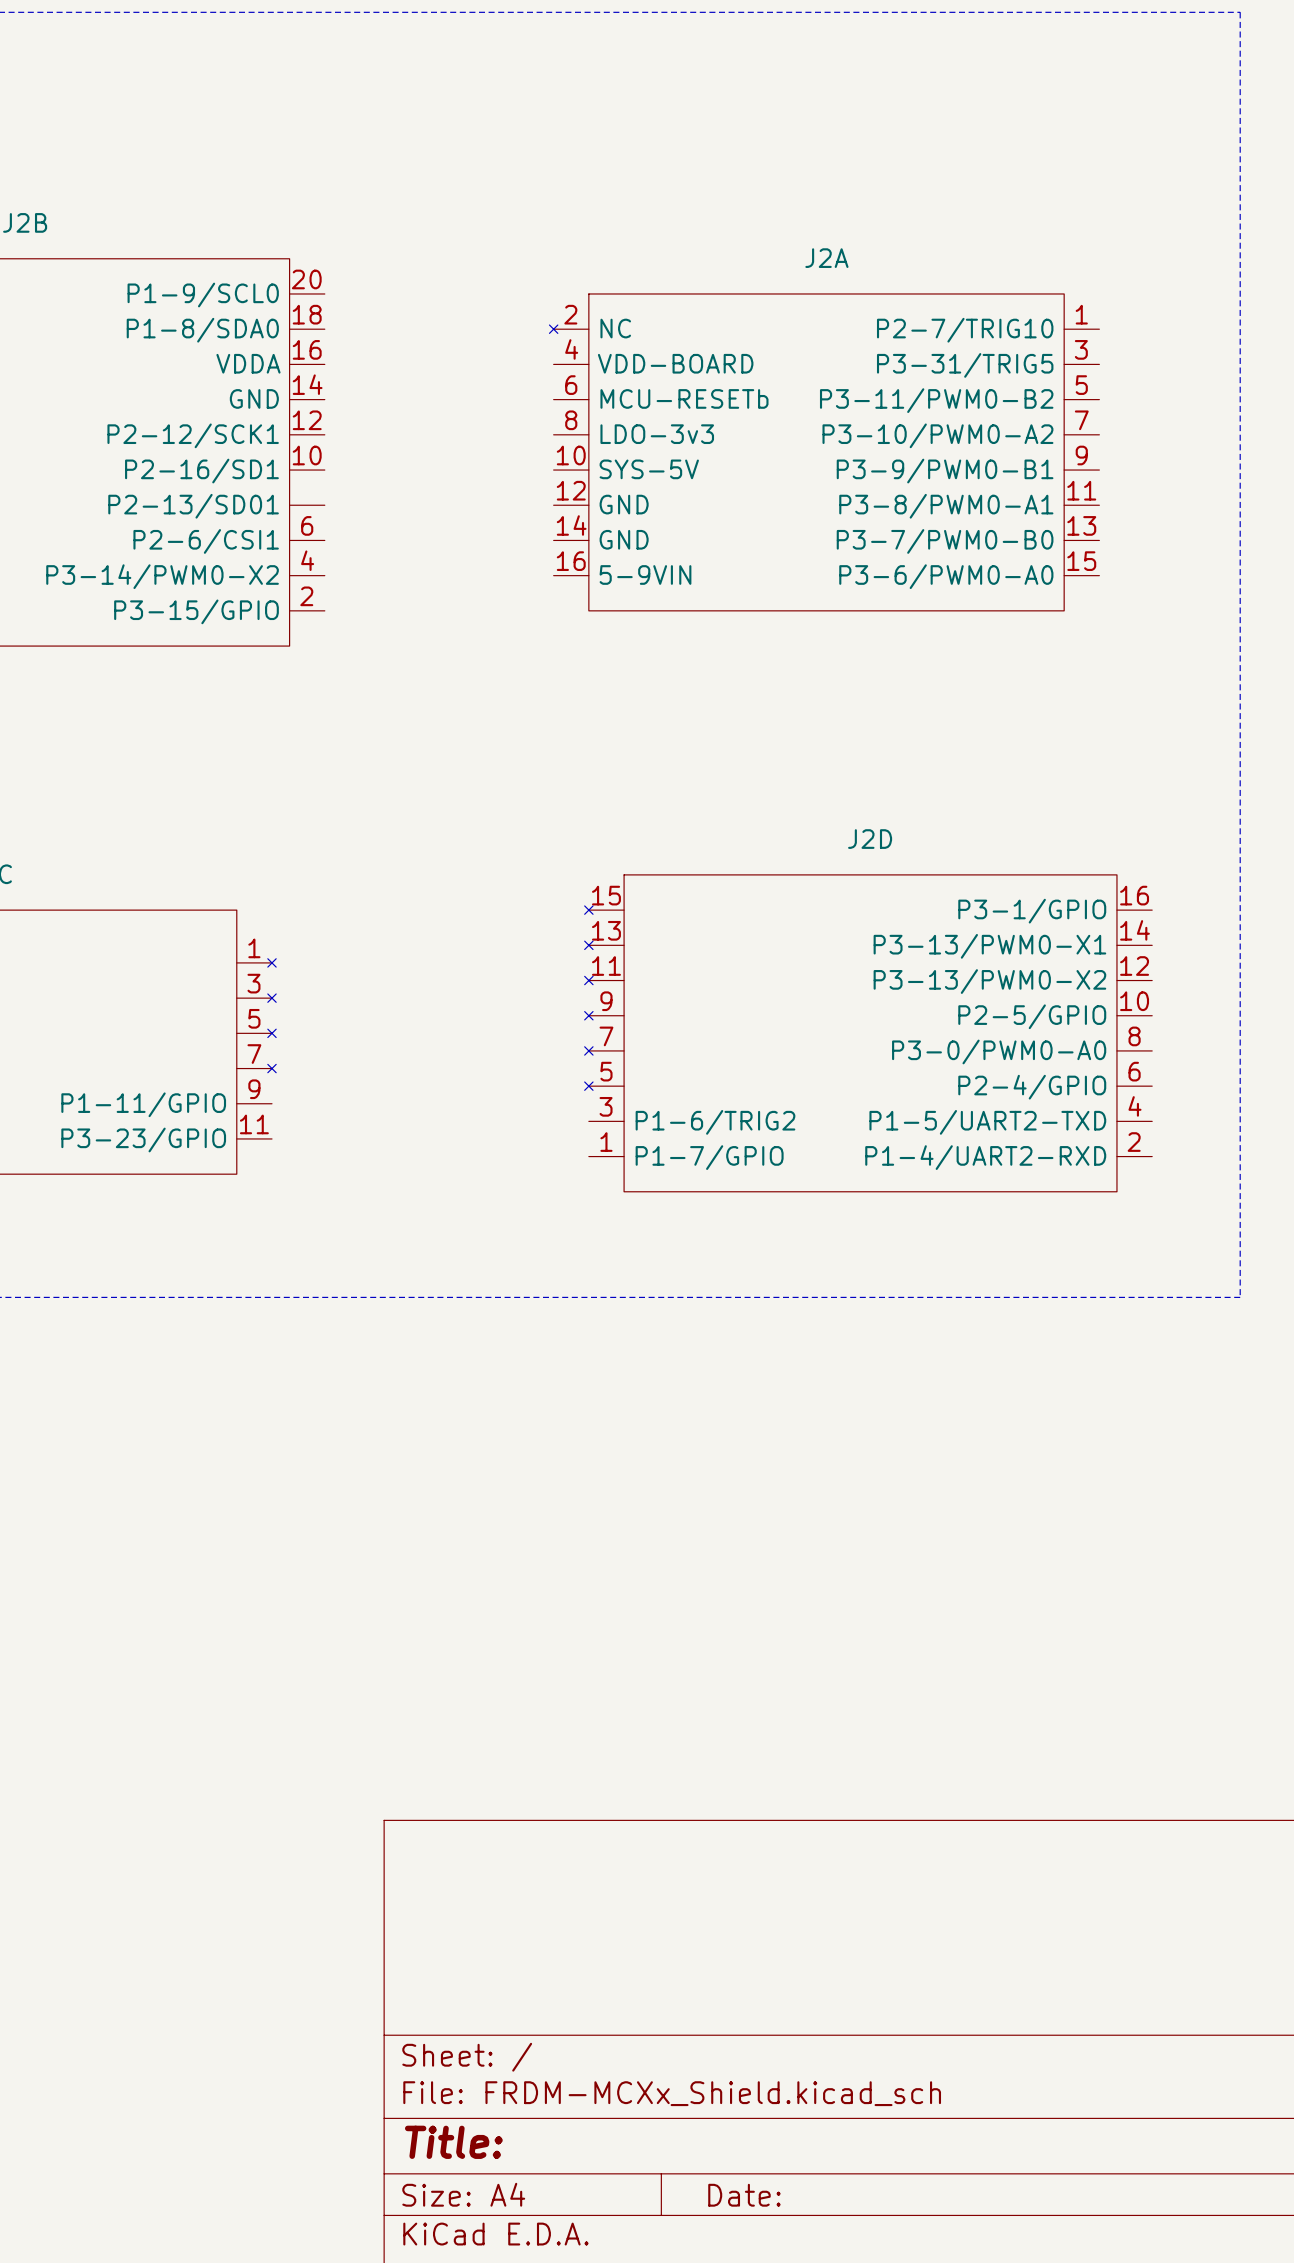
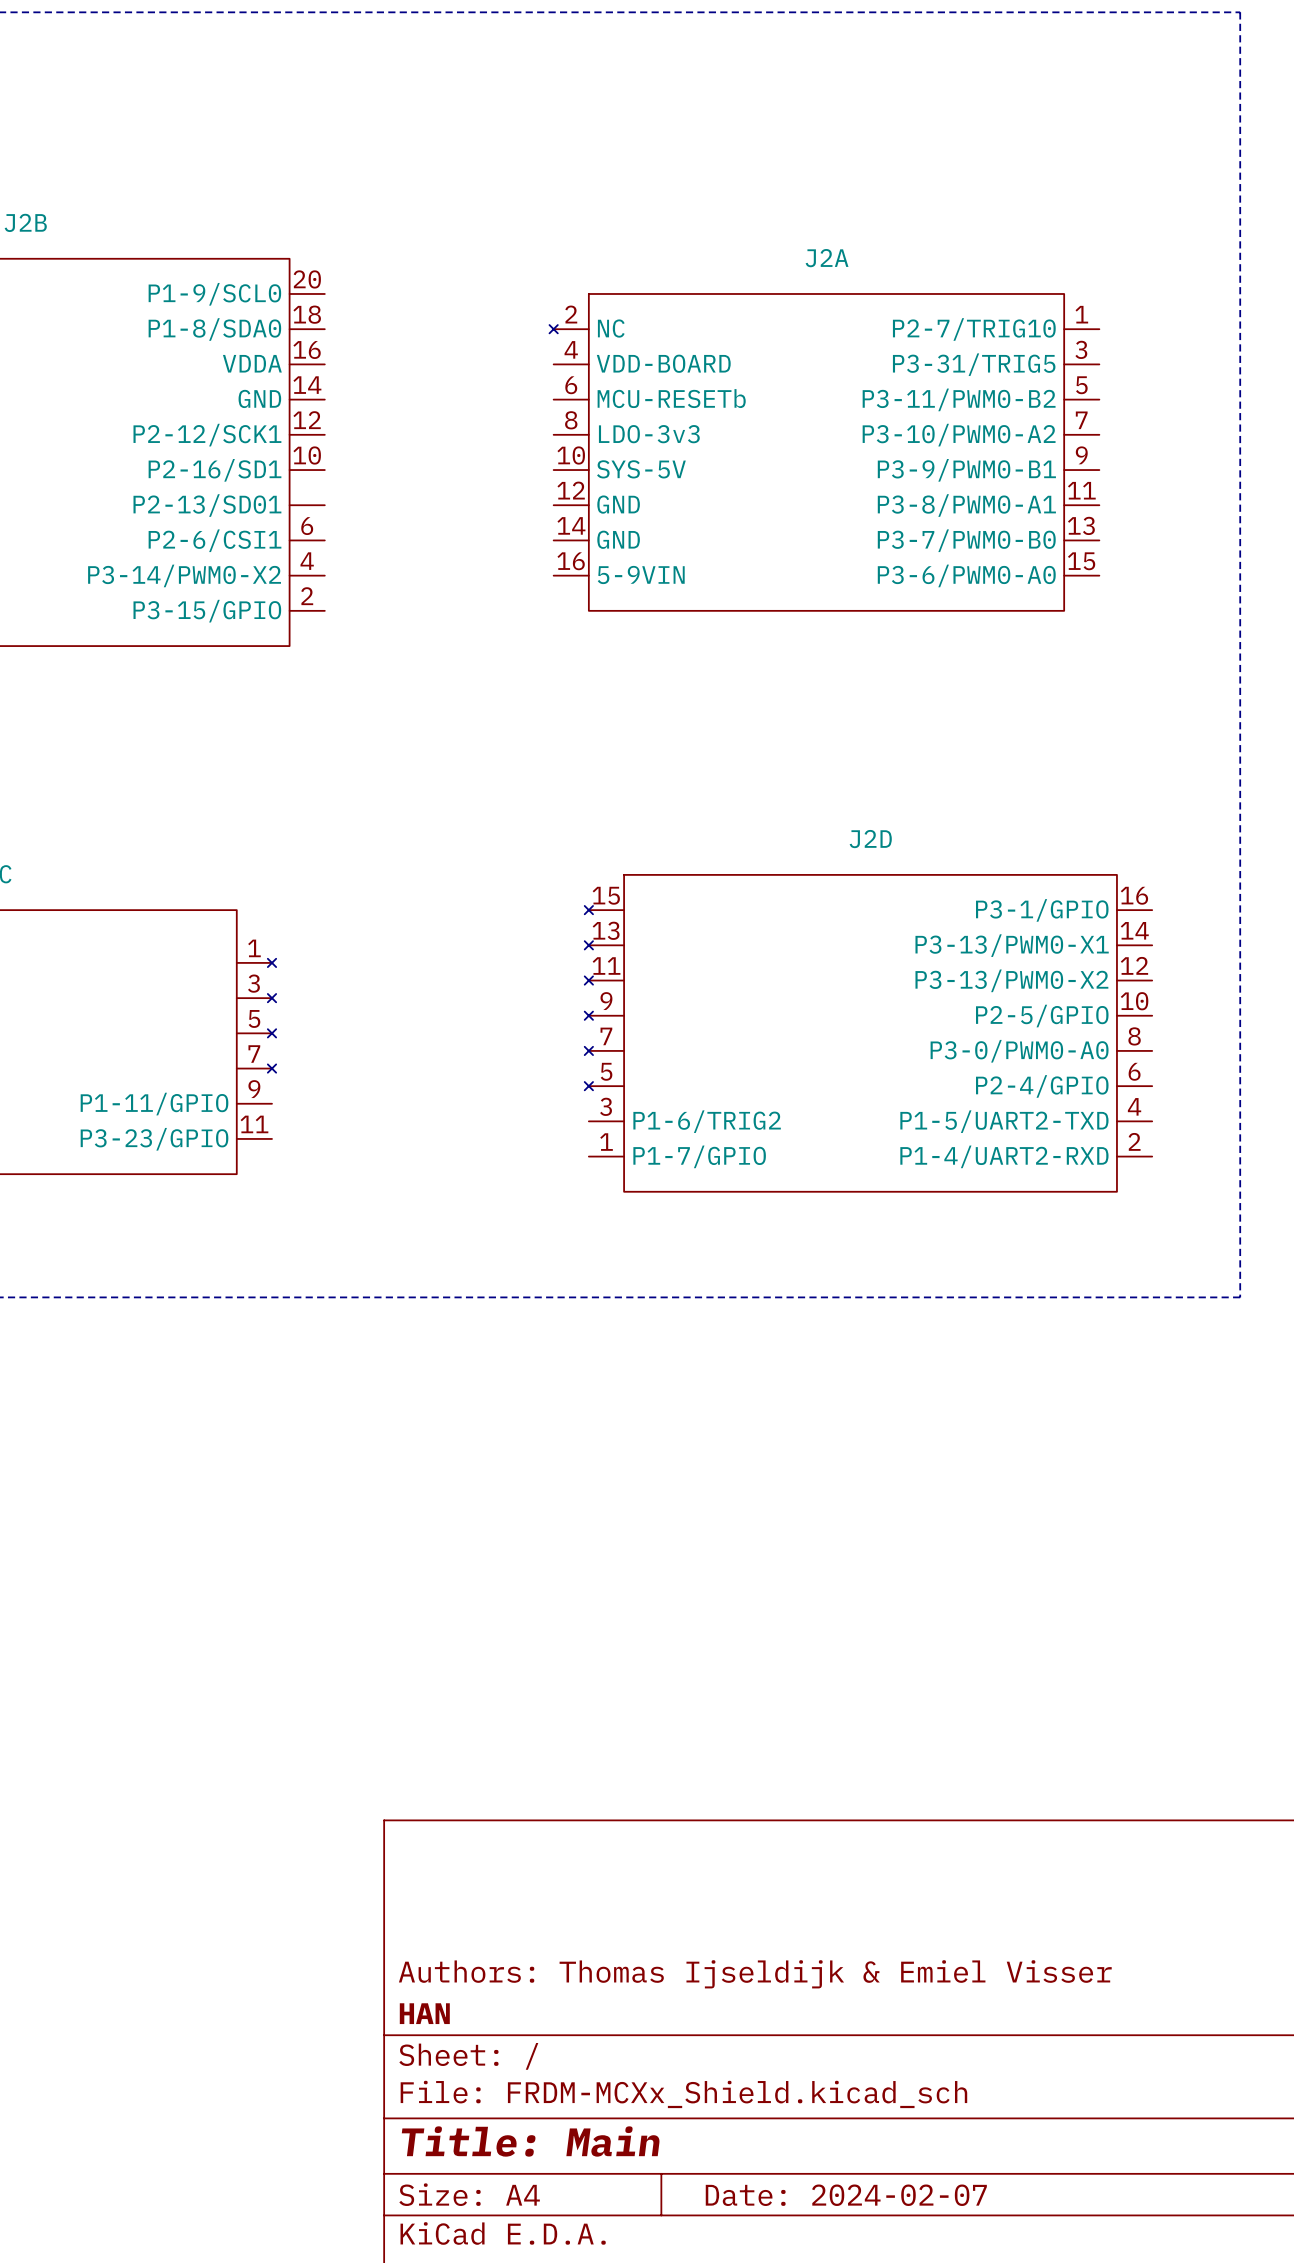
title block: none -> Authors: Thomas Ijseldijk & Emiel Visser (755, 1974)
title block: none -> HAN (424, 2013)
title block: Title: (453, 2142) -> Title: Main (530, 2141)
title block: Date: (744, 2195) -> Date: 2024-02-07 (846, 2195)

